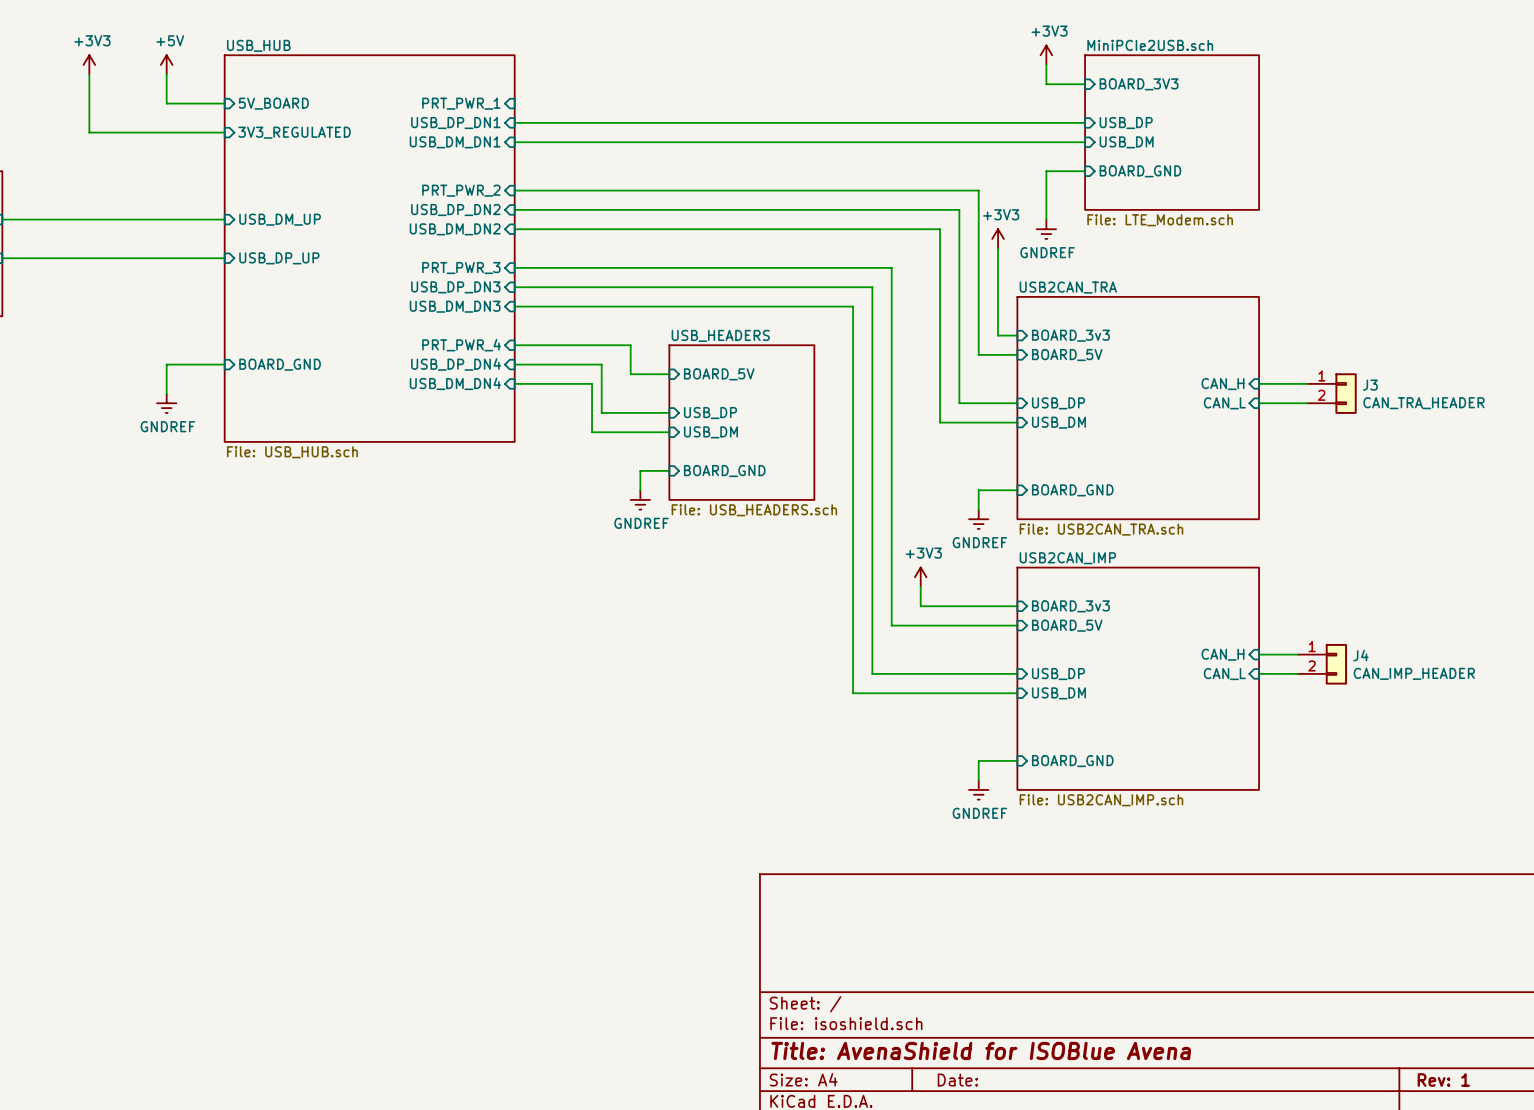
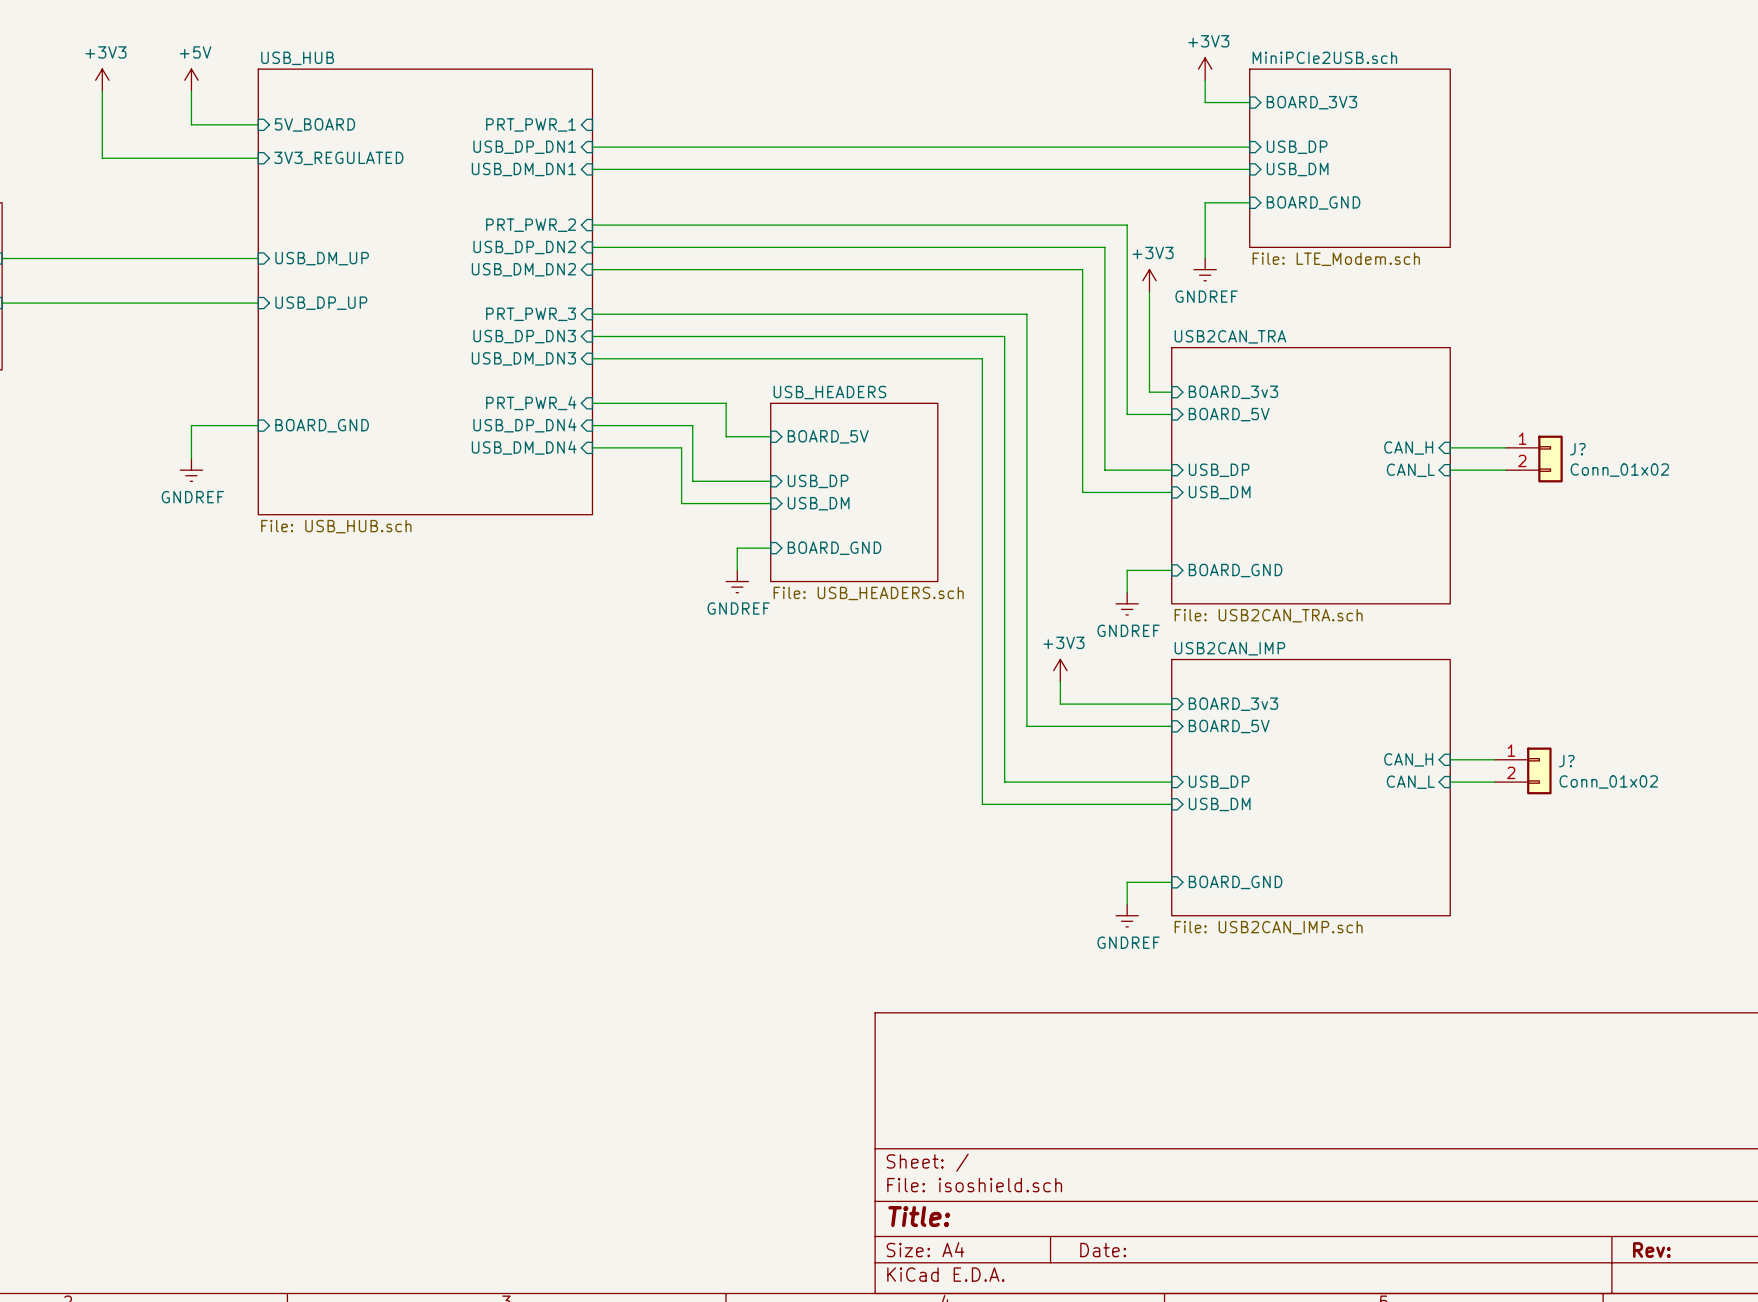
J3 name: J3 (1370, 385) -> J? (1577, 449)
J3 value: CAN_TRA_HEADER (1423, 403) -> Conn_01x02 (1619, 470)
J4 name: J4 (1360, 655) -> J? (1566, 761)
J4 value: CAN_IMP_HEADER (1414, 673) -> Conn_01x02 (1608, 781)
title block: Title: AvenaShield for ISOBlue Avena (981, 1050) -> Title: (919, 1216)
title block: Rev: 1 (1443, 1080) -> Rev: (1651, 1250)

